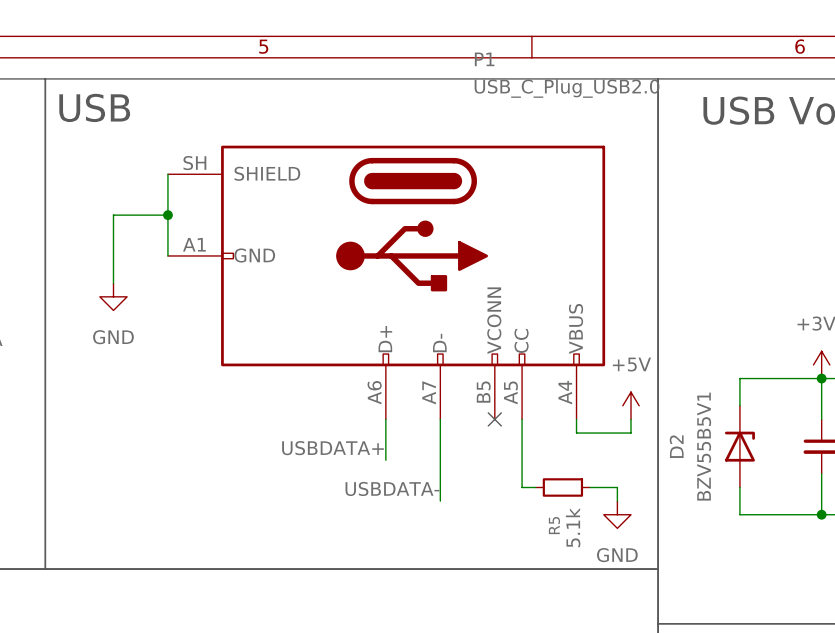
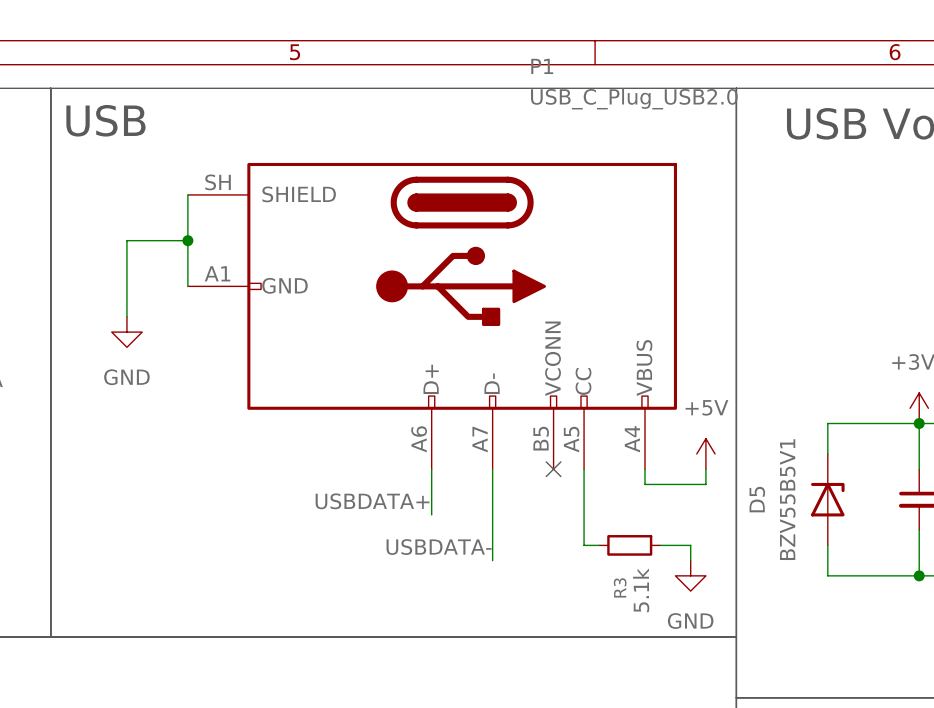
D2 name: D2 (676, 446) -> D5 (757, 499)
R5 name: R5 (554, 525) -> R3 (620, 587)

